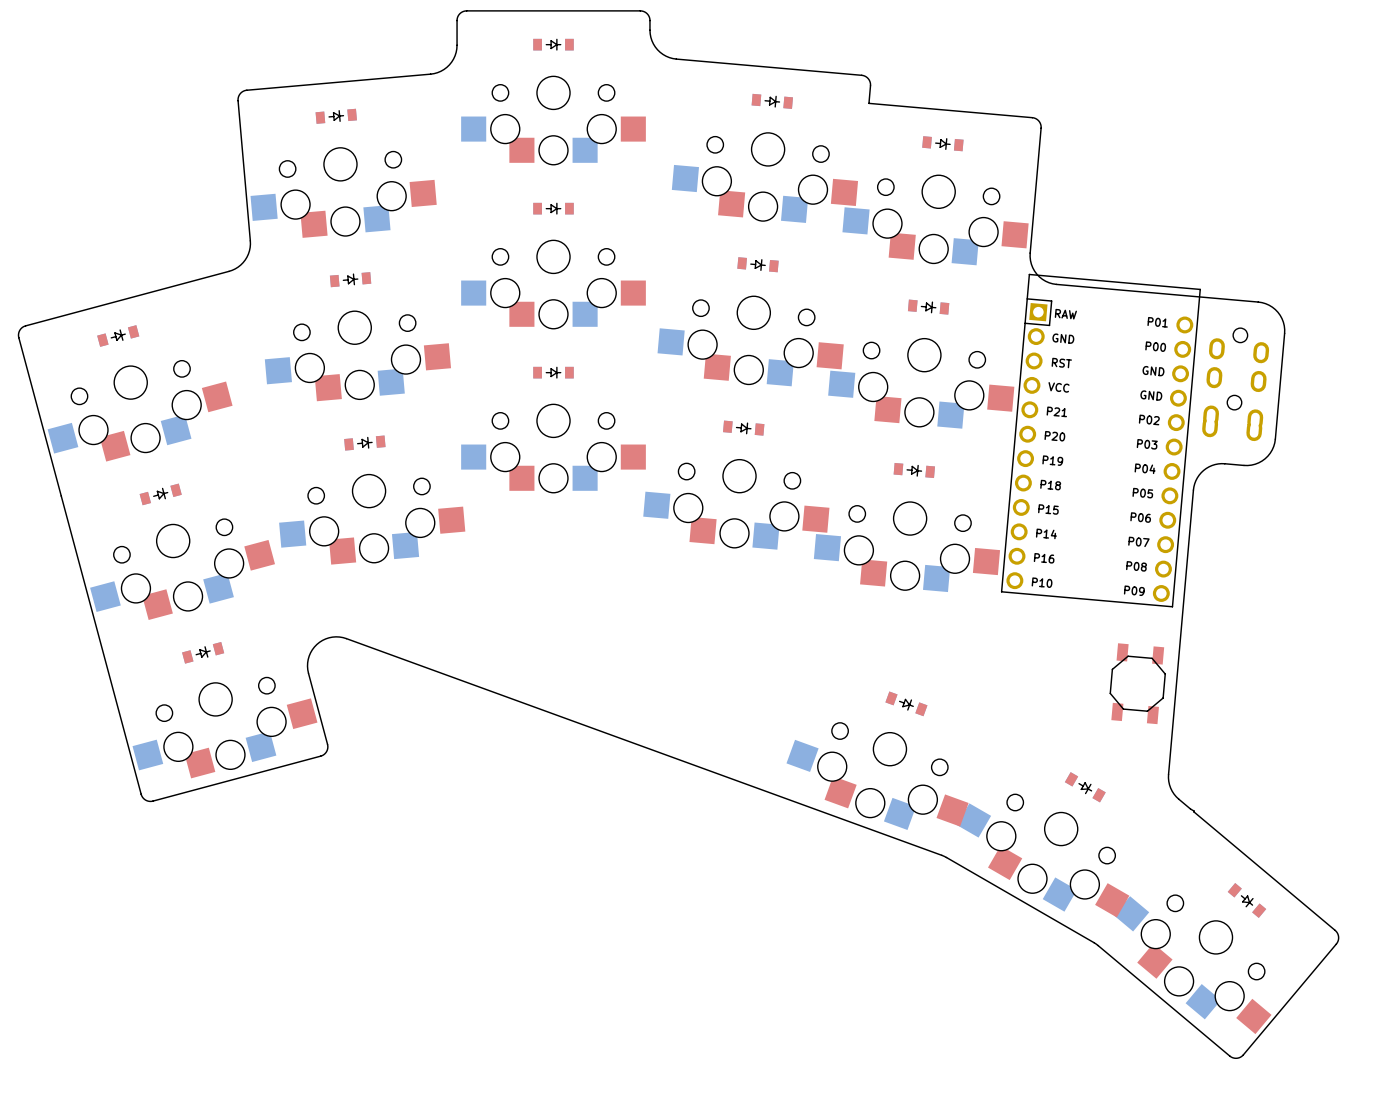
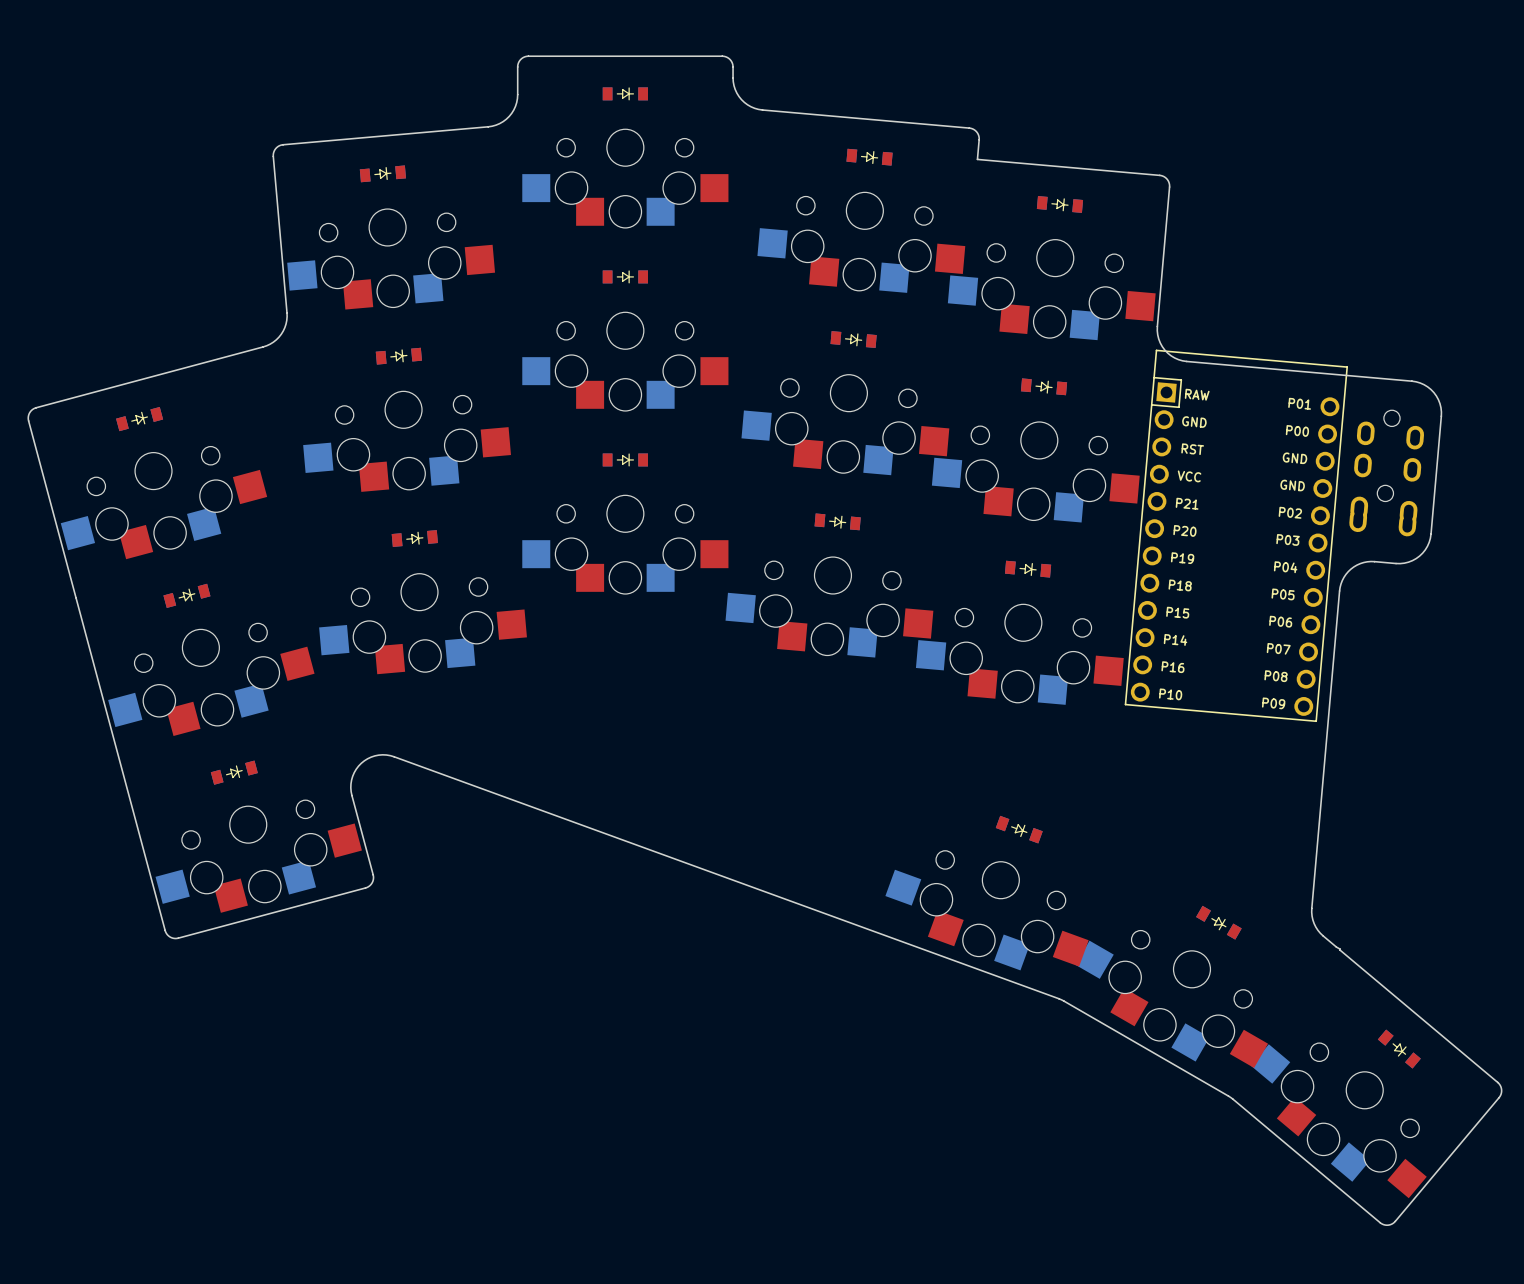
part: (1137, 683) -> none

